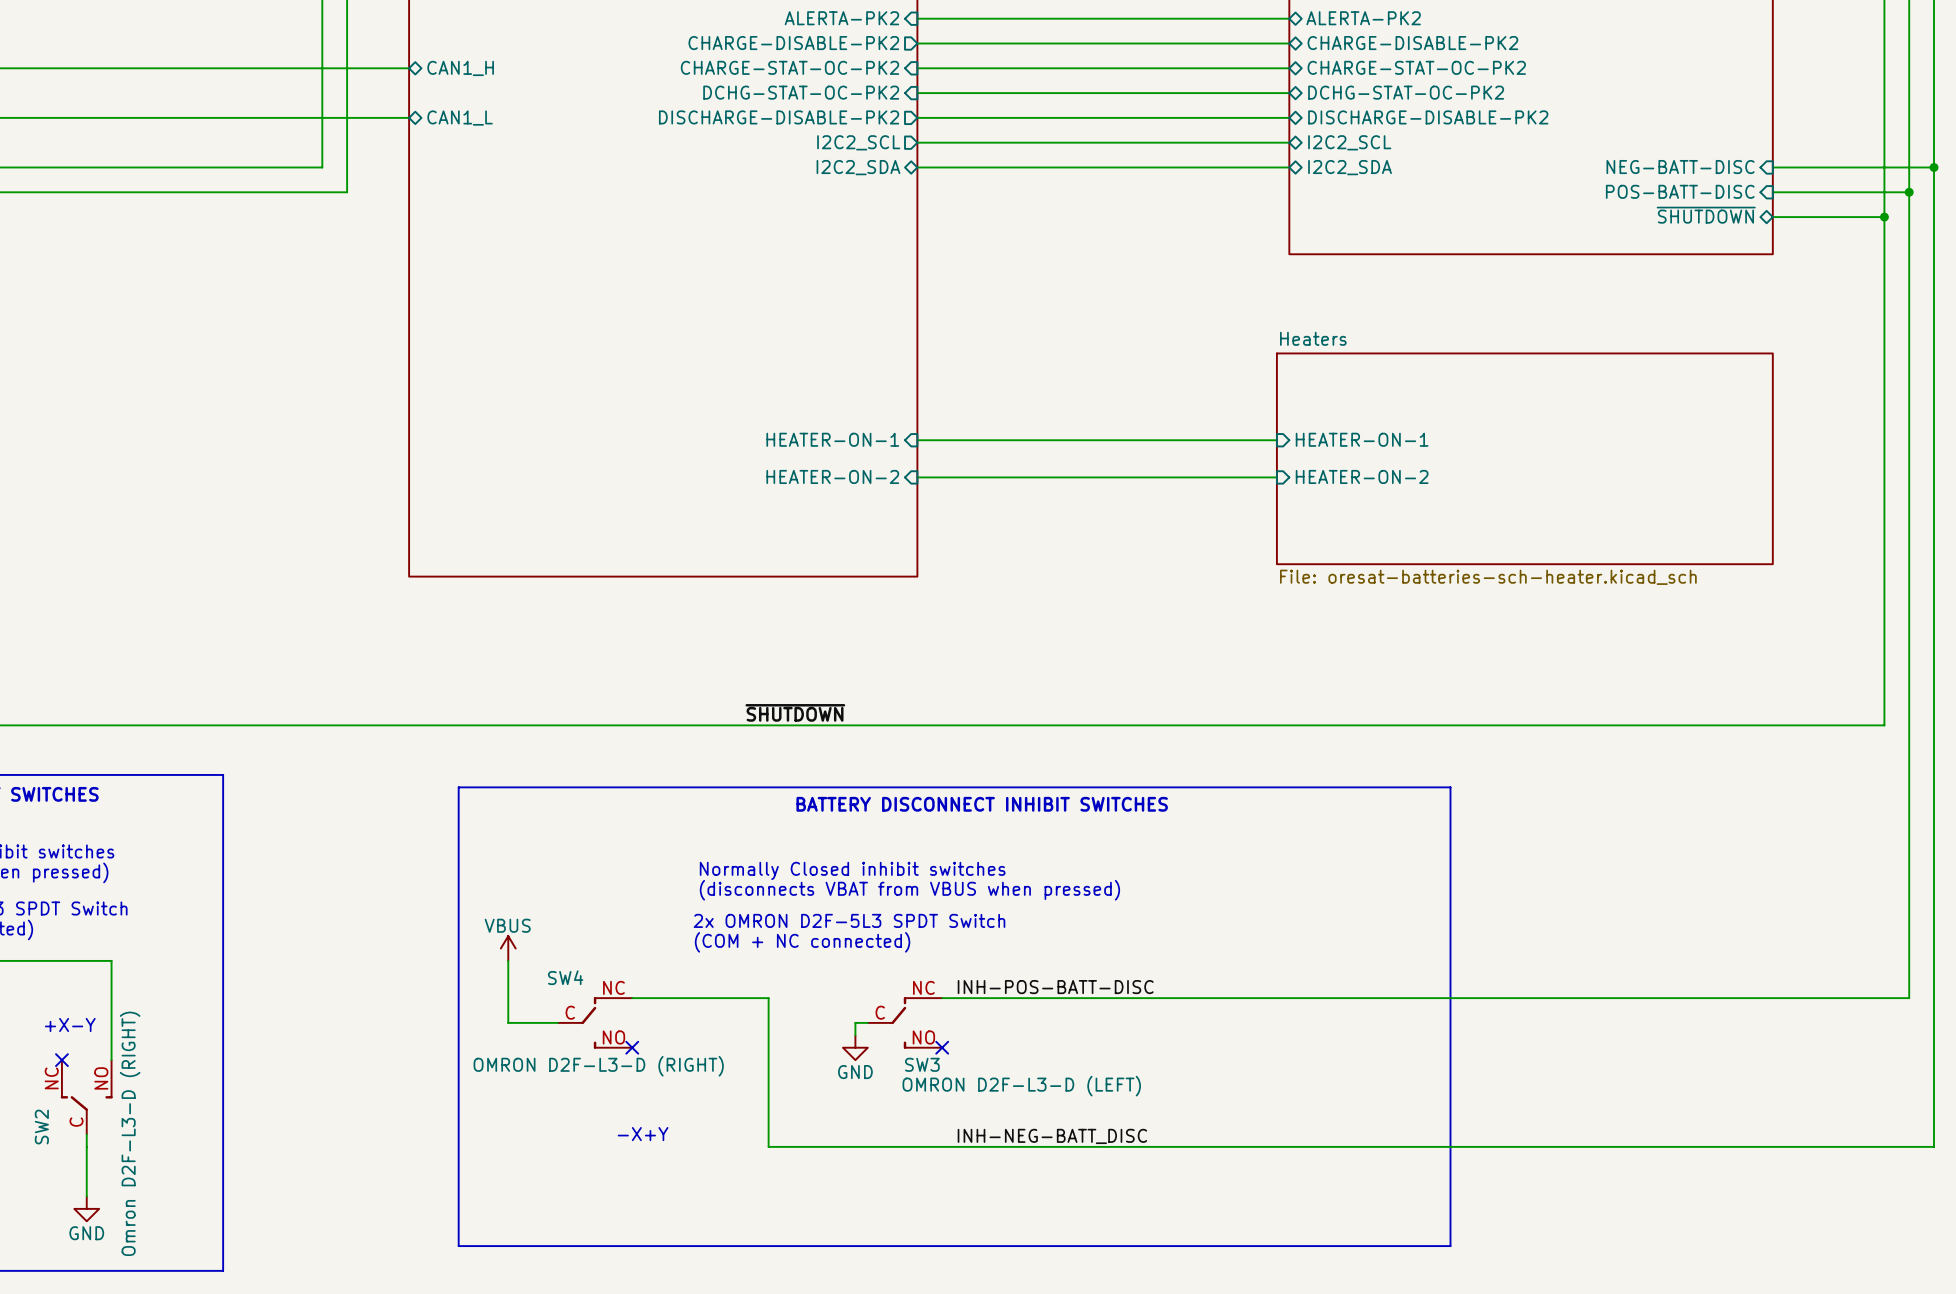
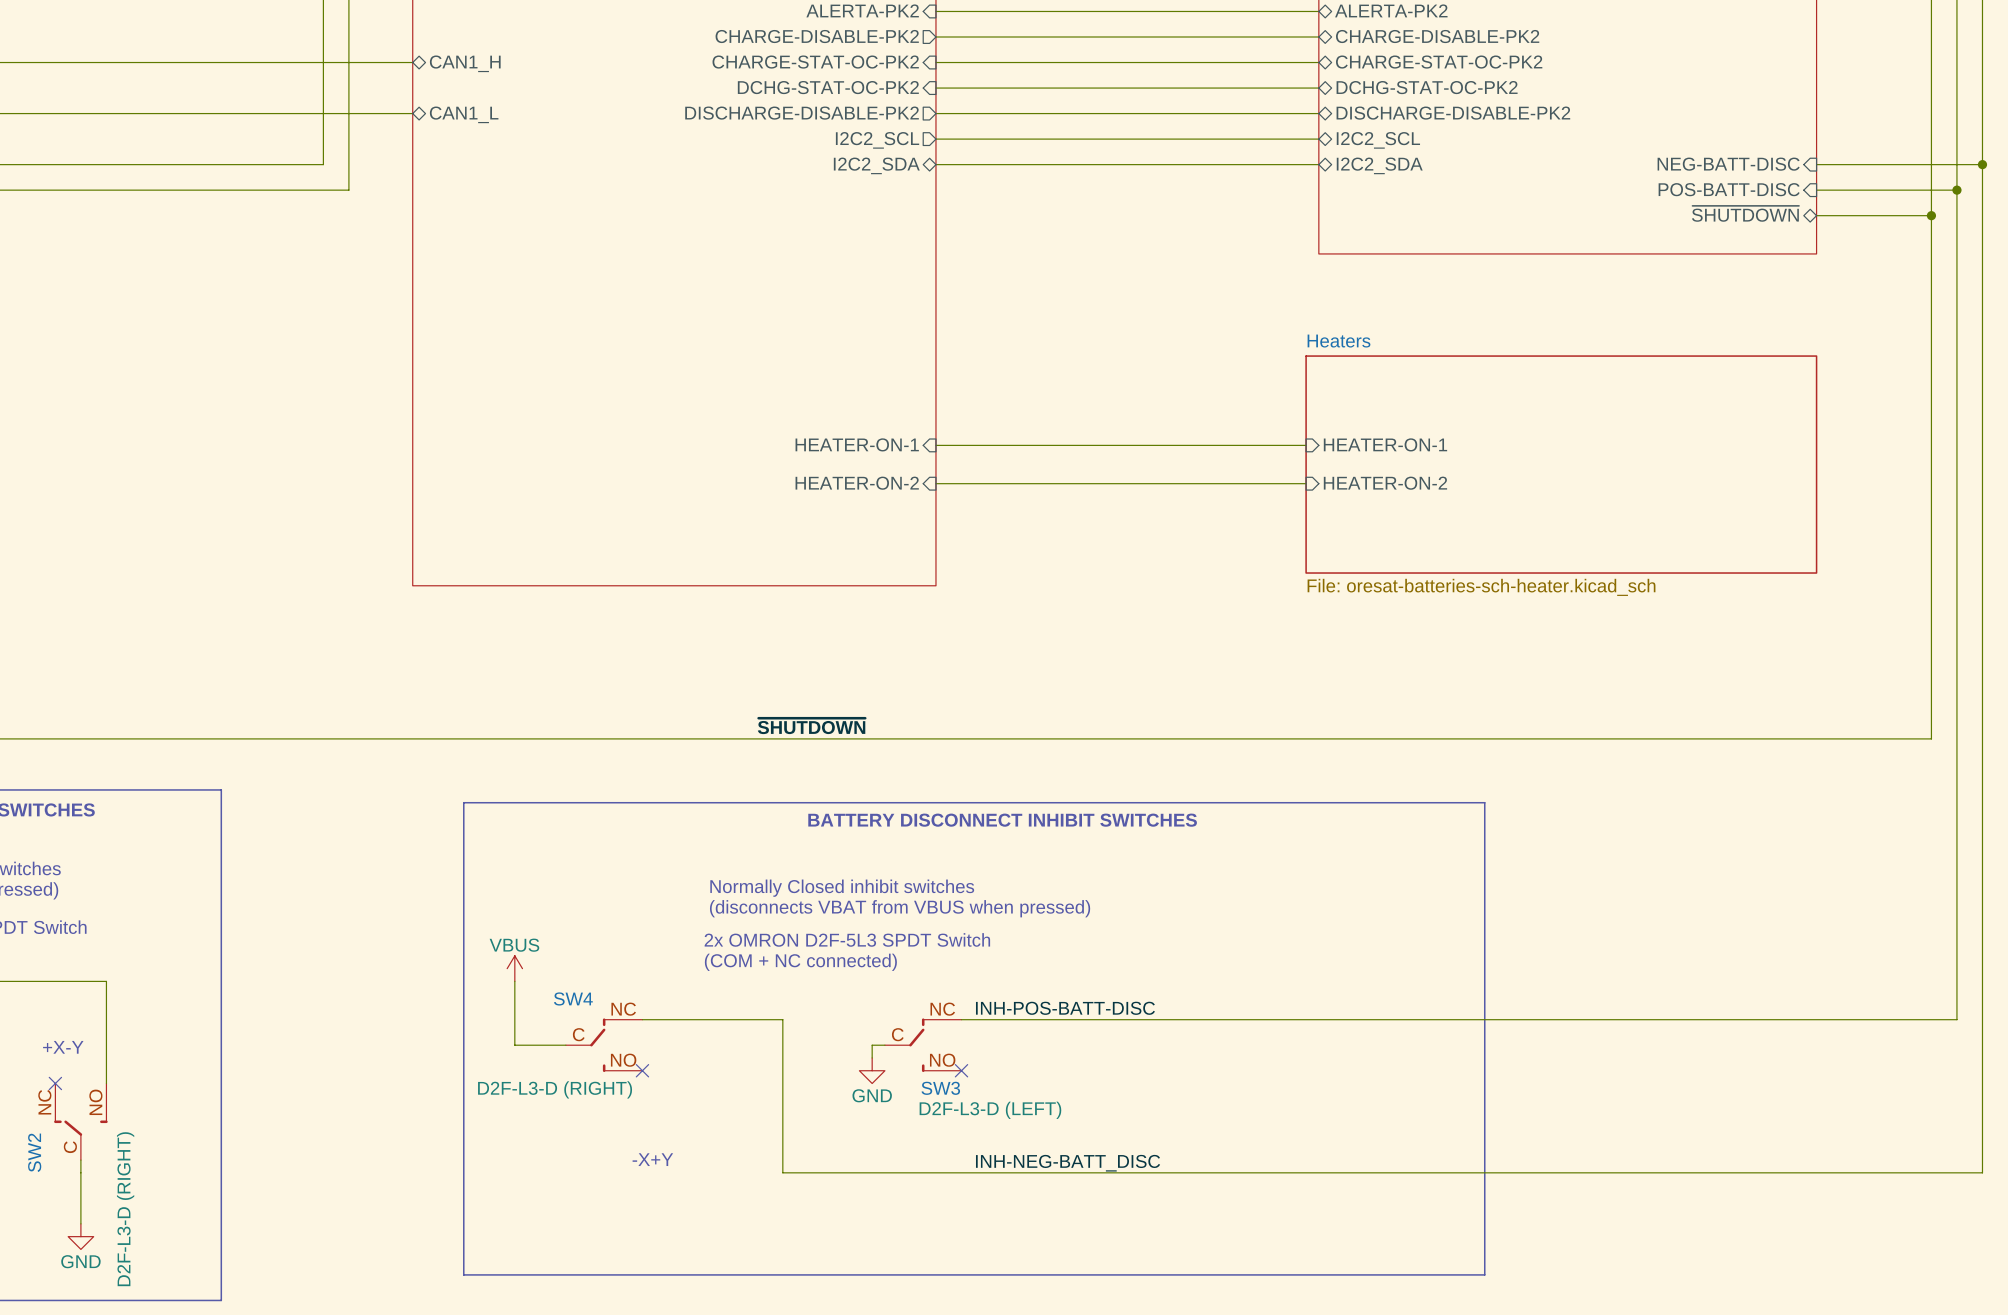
SW4 value: OMRON D2F-L3-D (RIGHT) (598, 1066) -> D2F-L3-D (RIGHT) (555, 1089)
SW3 value: OMRON D2F-L3-D (LEFT) (1021, 1086) -> D2F-L3-D (LEFT) (990, 1110)
SW2 value: Omron D2F-L3-D (RIGHT) (130, 1133) -> D2F-L3-D (RIGHT) (125, 1209)

